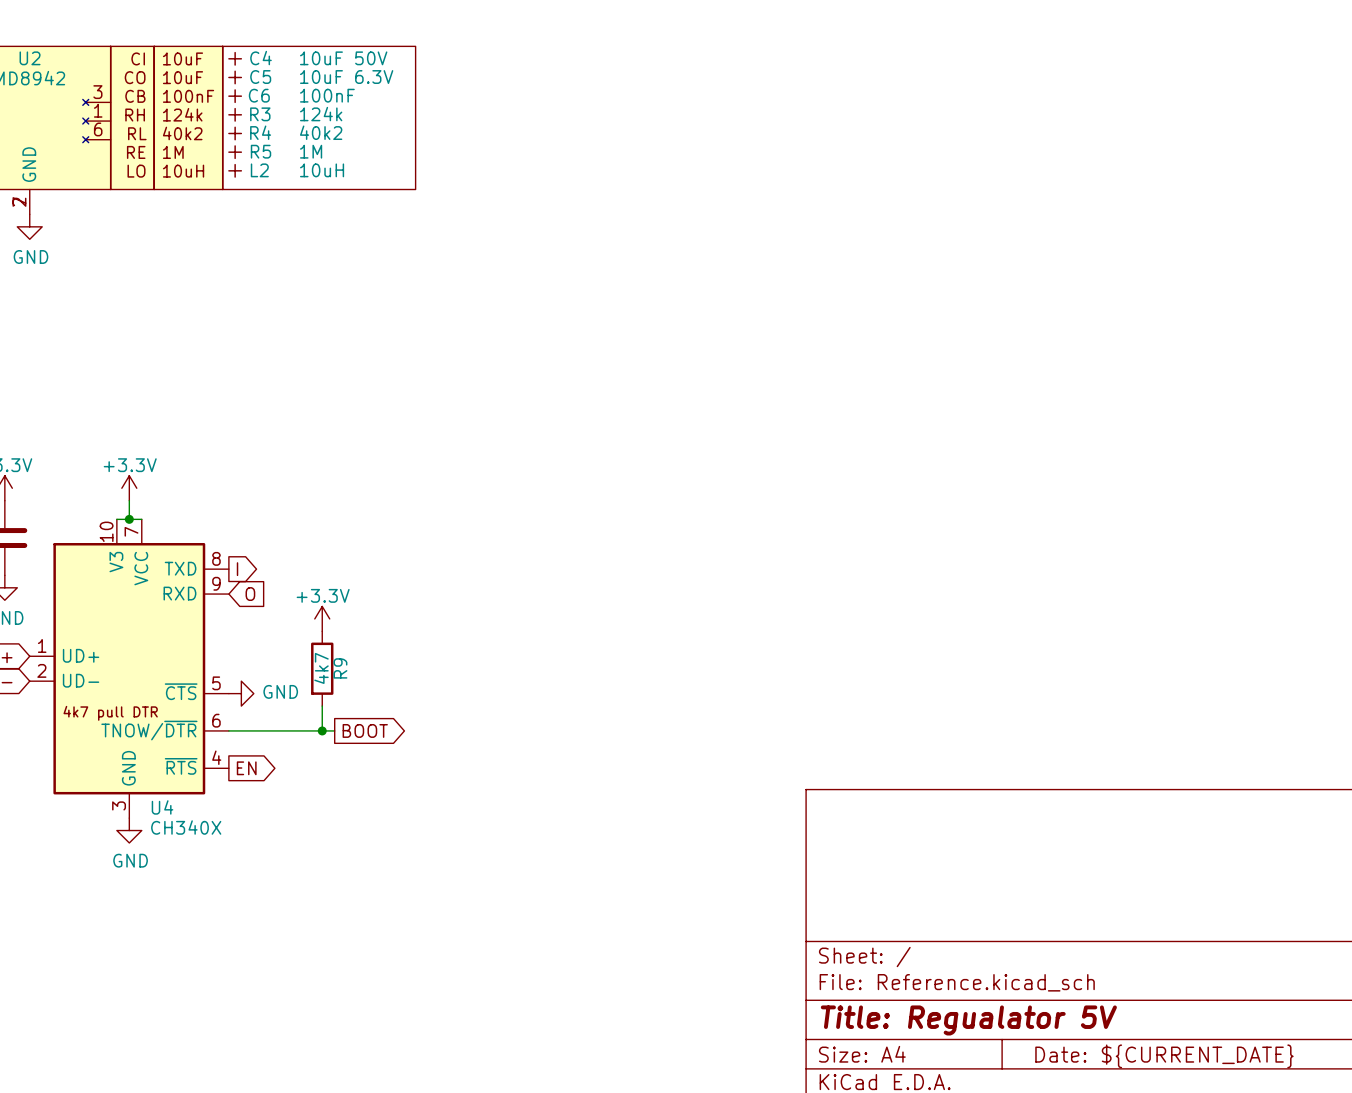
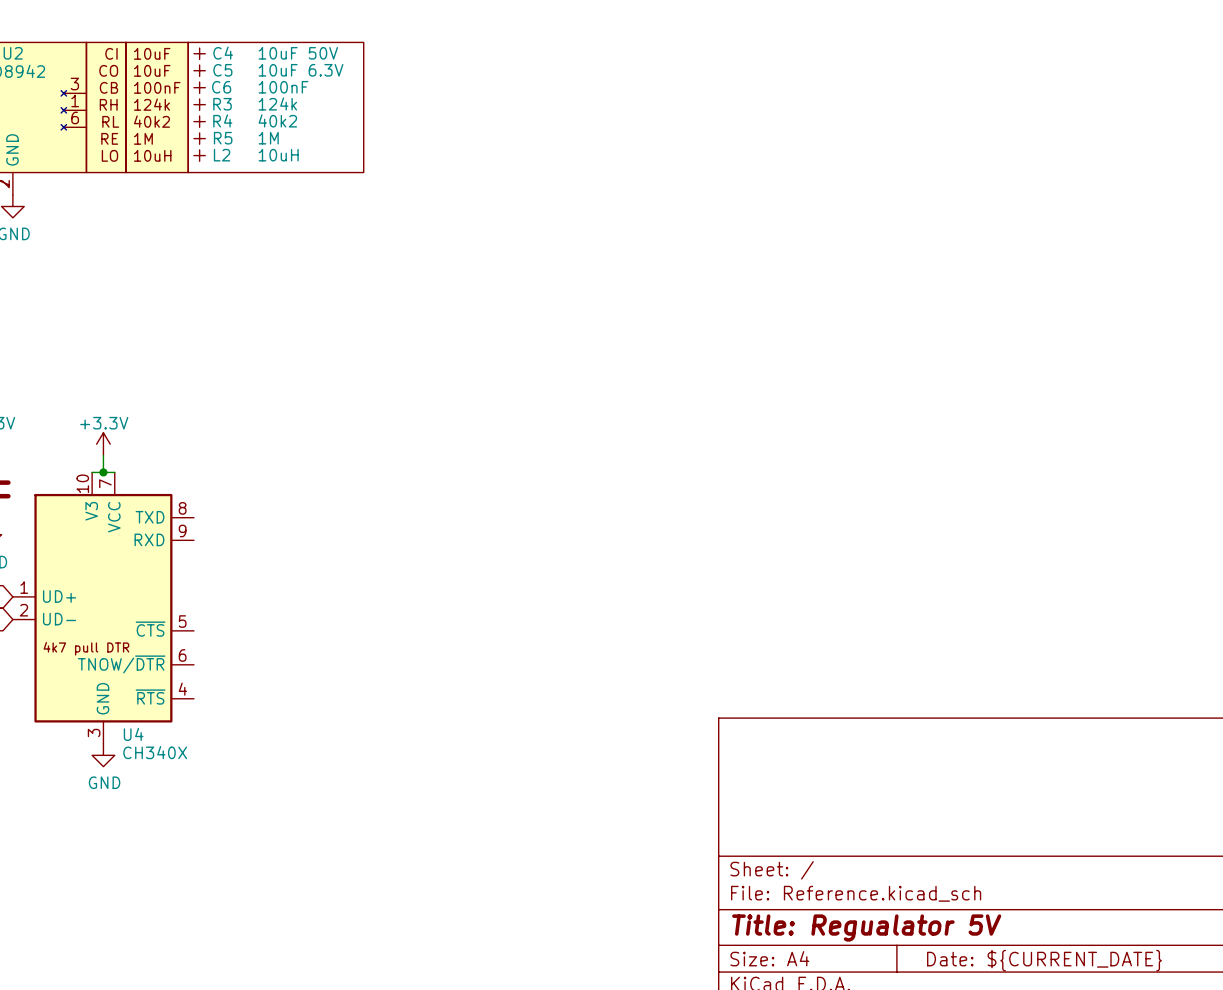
global label: I (237, 569) -> none
global label: O (250, 594) -> none
power symbol: +3.3V (322, 618) -> none
R9: 4k7 (322, 668) -> none
power symbol: GND (241, 693) -> none
wire: (322, 706) (322, 730) -> none
wire: (228, 730) (334, 730) -> none
junction: (322, 730) -> none
global label: BOOT (365, 730) -> none
global label: EN (246, 768) -> none

